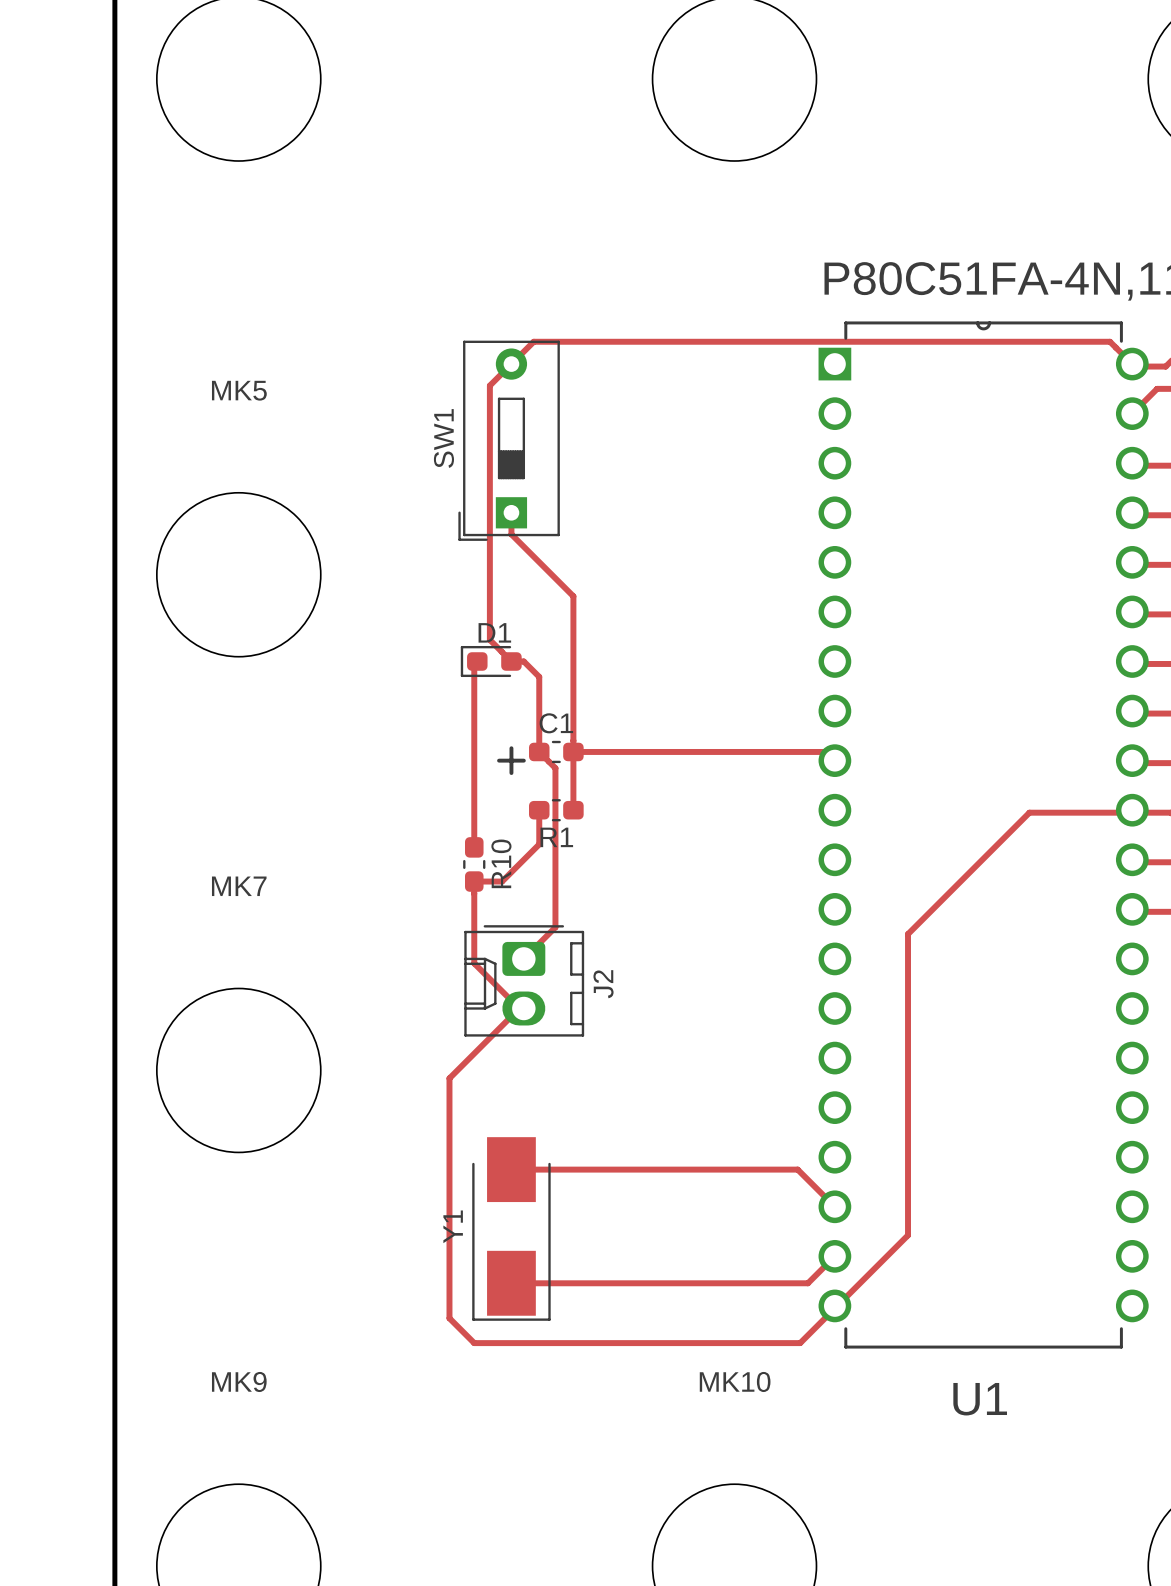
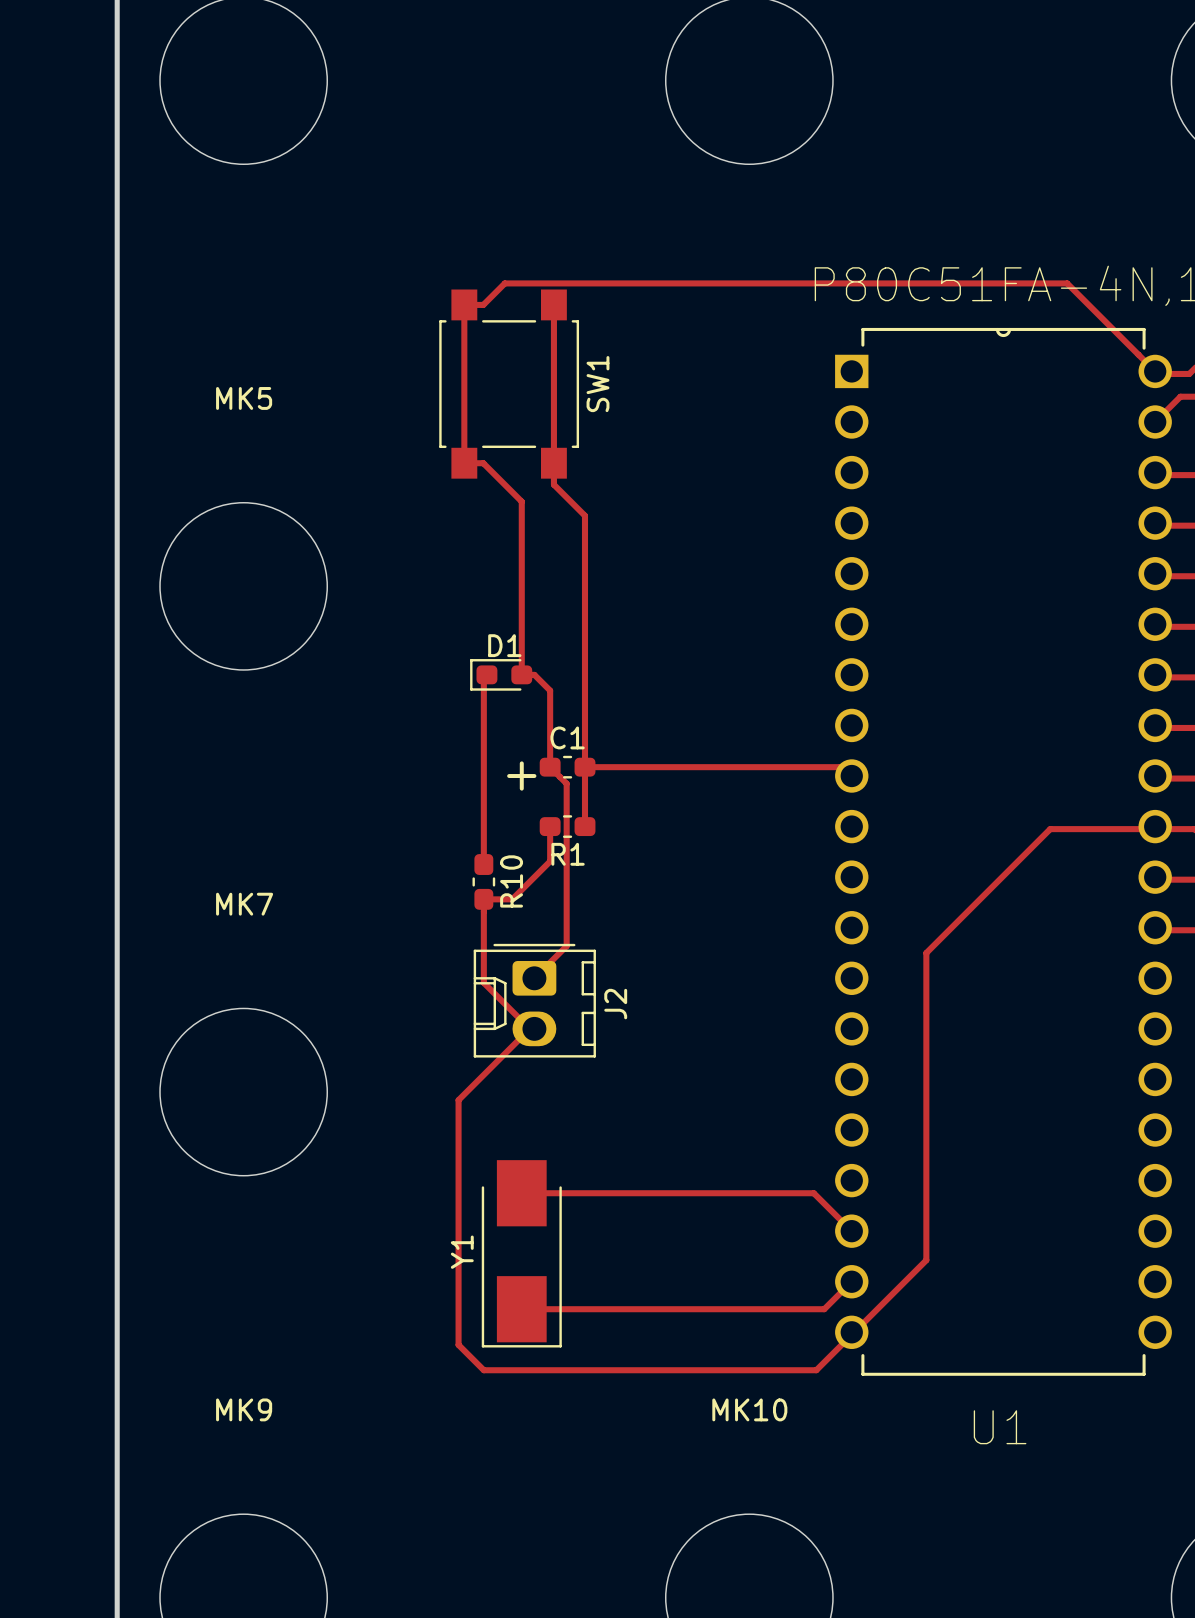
track: none -> (553, 304) (553, 484) (584, 515) (584, 755)
SW1 footprint: [458, 340, 560, 541] -> [439, 289, 580, 479]
track: (1110, 341) (533, 341) (489, 385) (489, 639) (511, 661) -> (1132, 348) (1067, 283) (504, 283) (483, 304) (464, 304) (464, 463) (483, 463) (521, 501) (521, 523)
SW1 name position: SW1 (443, 438) -> SW1 (597, 384)
track: (511, 534) (573, 596) (573, 740) -> (521, 545) (521, 674)

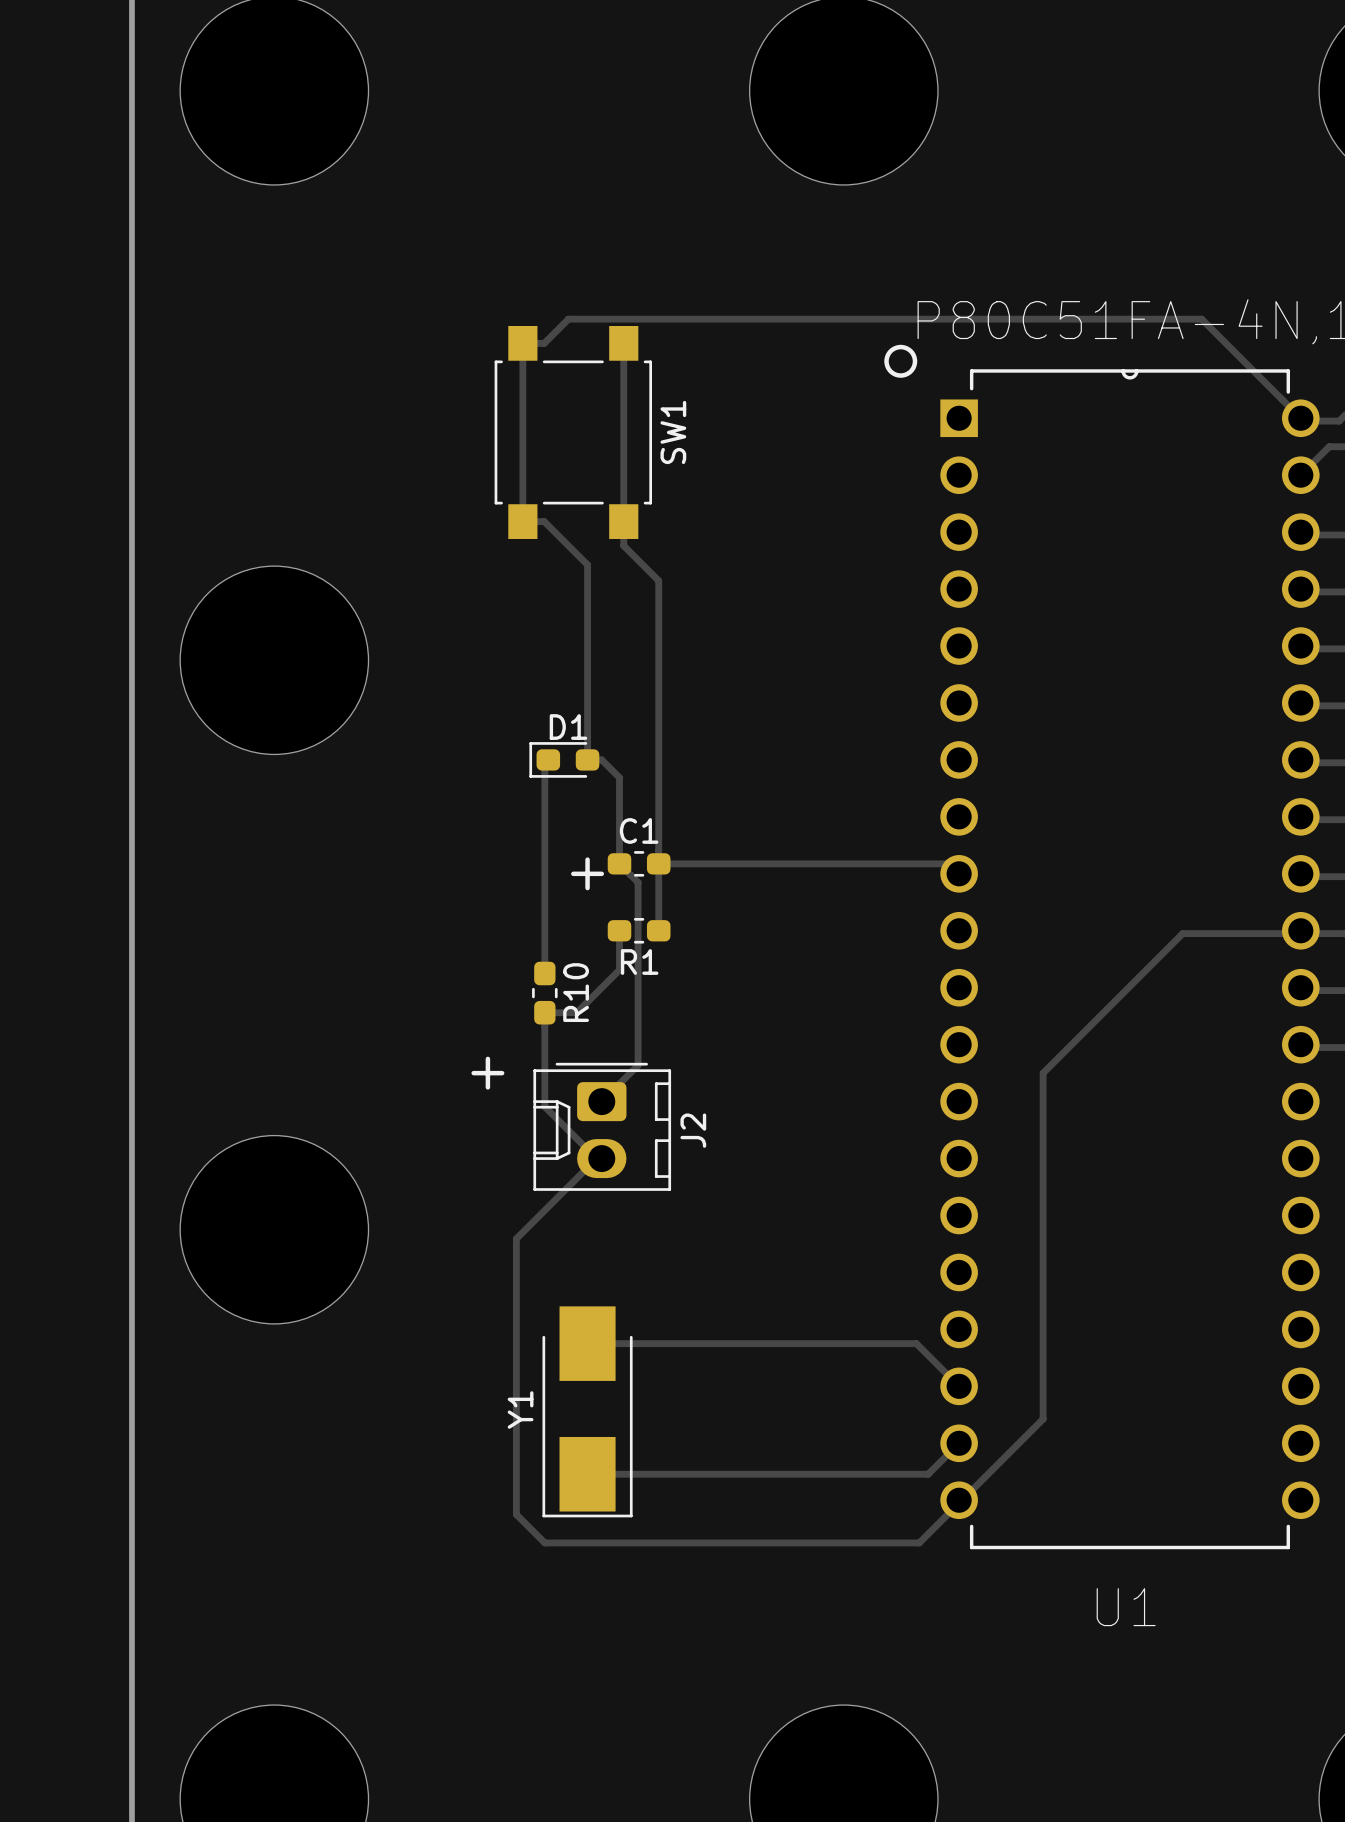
drawing: none -> [884, 344, 918, 378]
MK5 name: MK5 (244, 398) -> none
MK7 name: MK7 (244, 904) -> none
line: none -> (487, 1058) (487, 1087)
line: none -> (473, 1073) (502, 1073)
MK9 name: MK9 (244, 1409) -> none
MK10 name: MK10 (749, 1409) -> none

